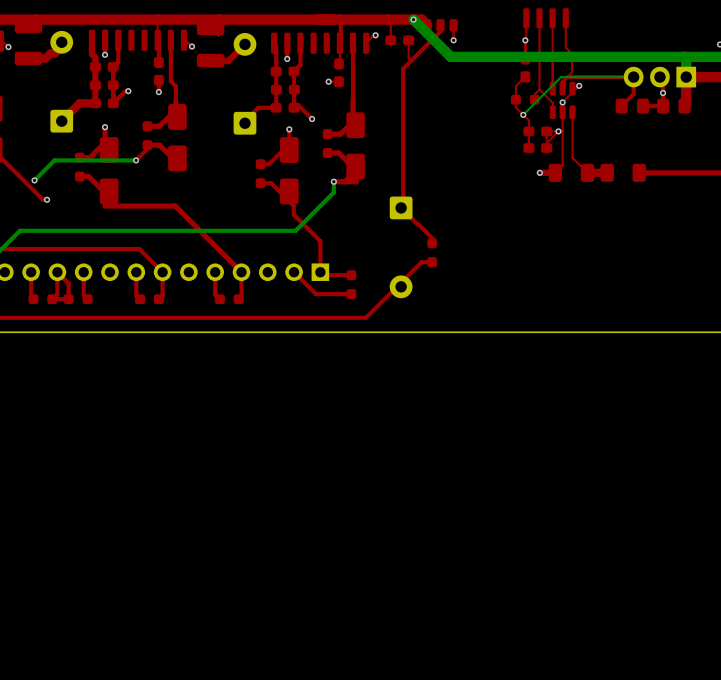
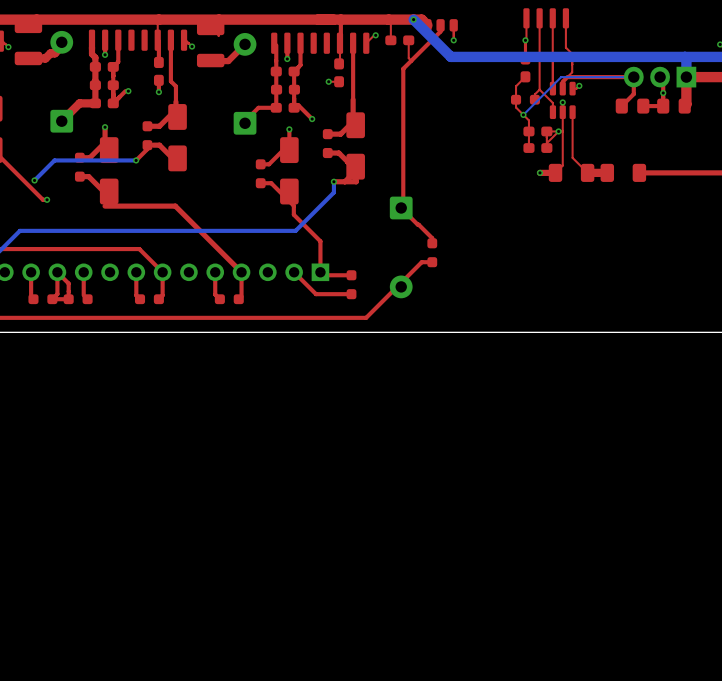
top track: (572, 88) (572, 92) (562, 102) -> none

